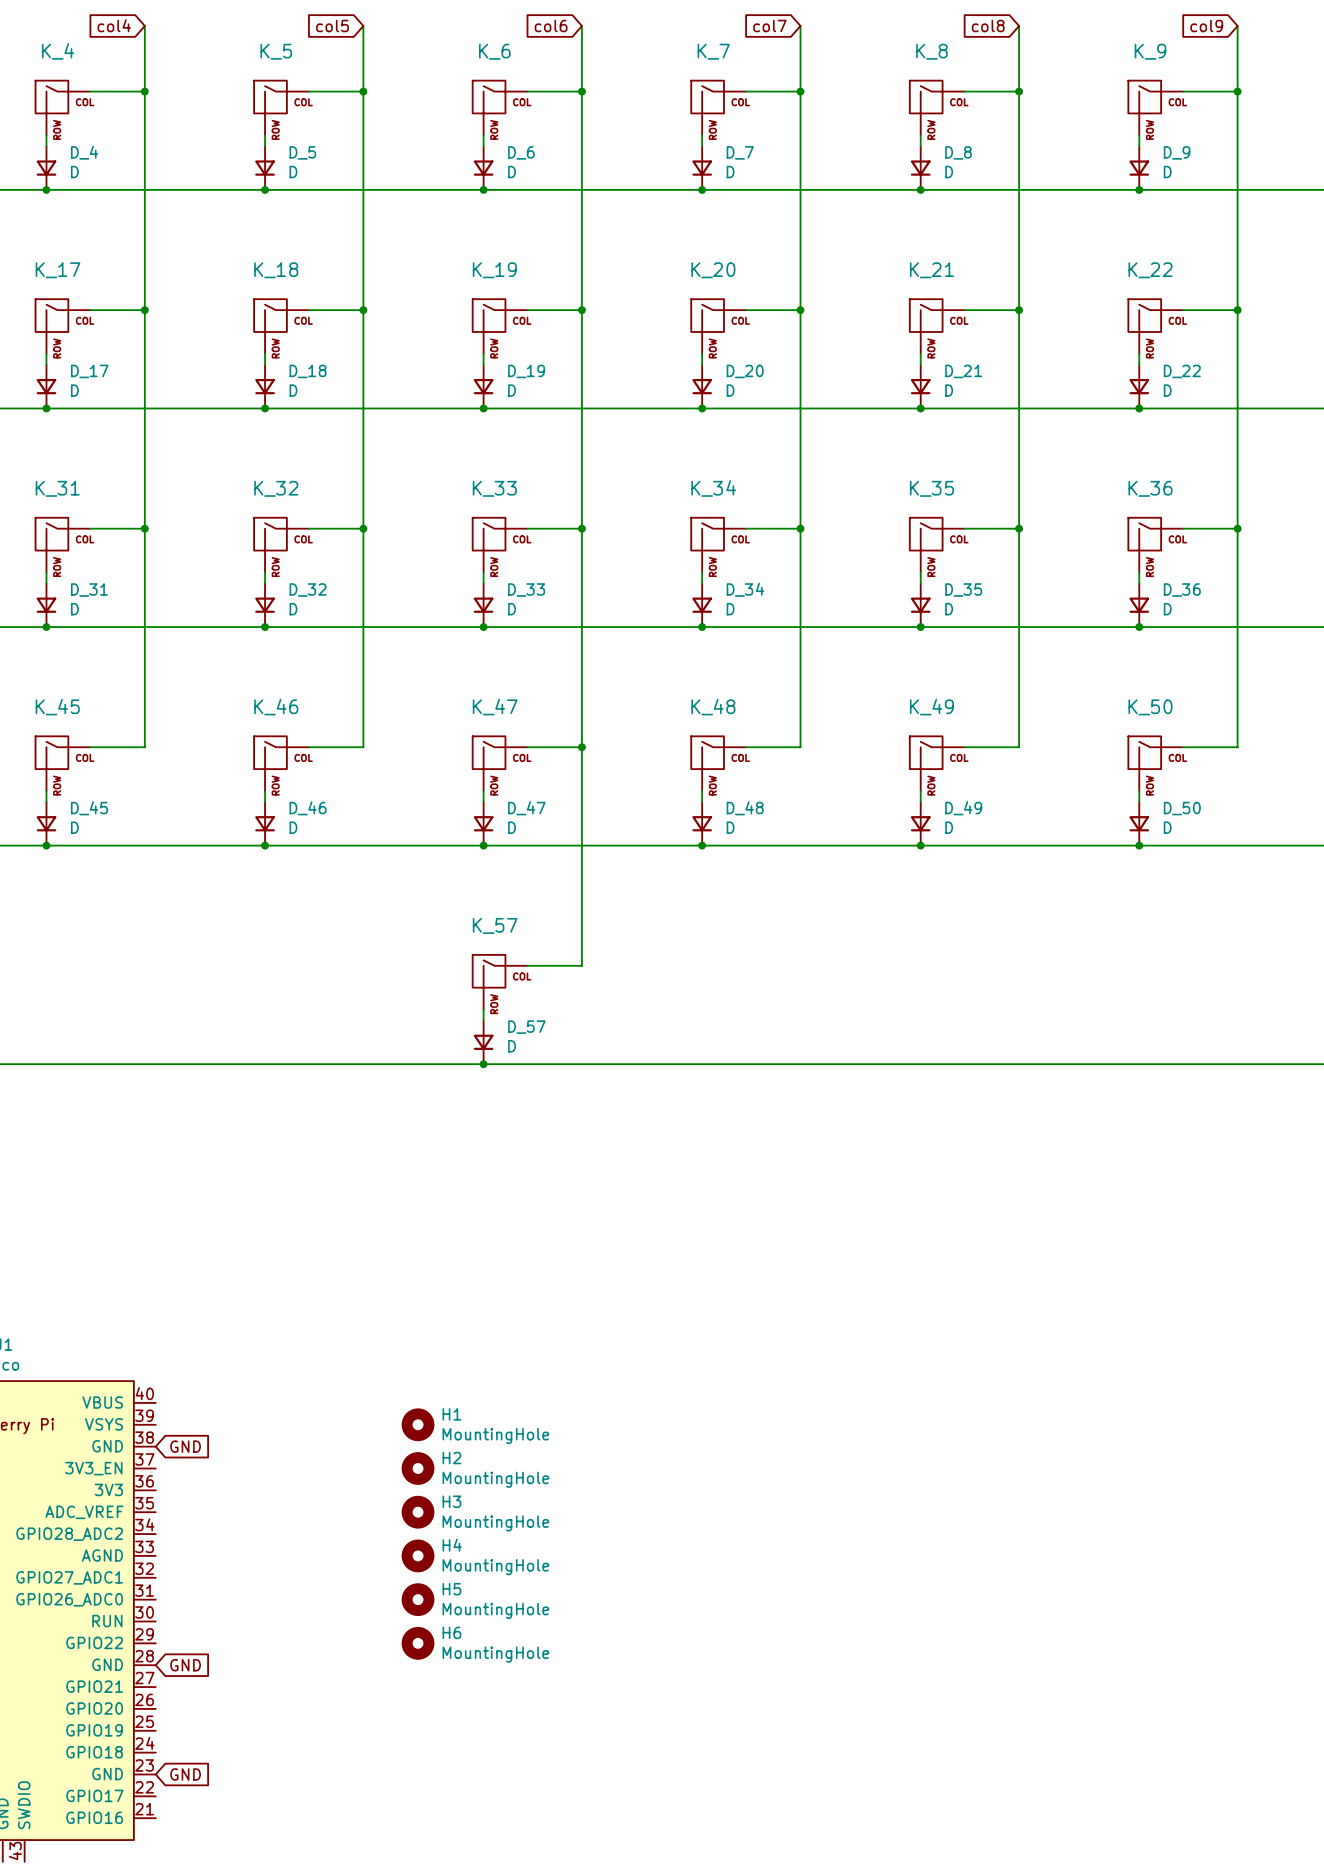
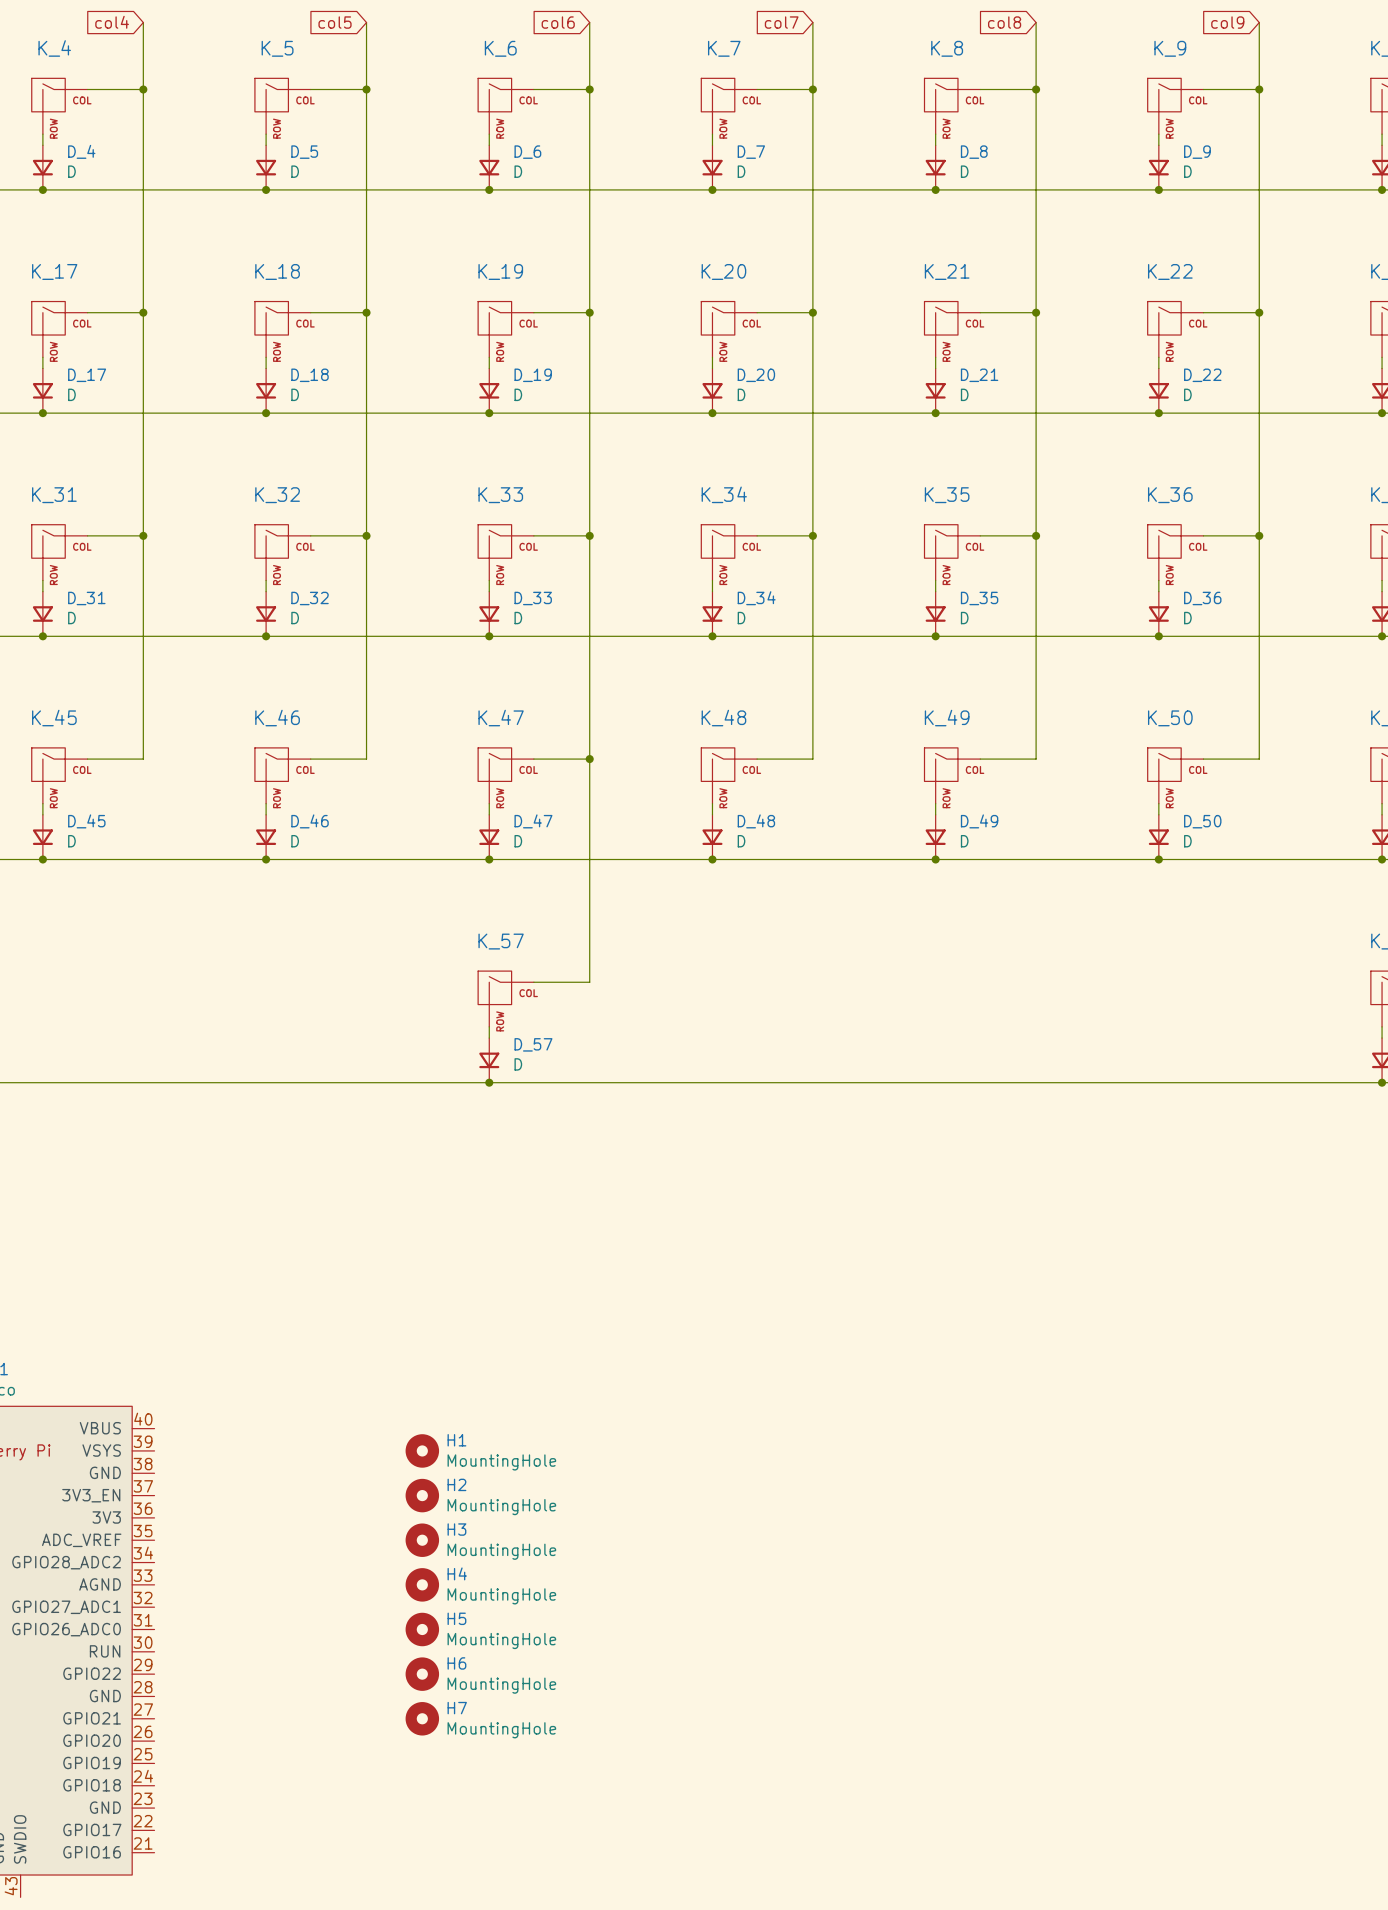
global label: GND (185, 1446) -> none
global label: GND (185, 1665) -> none
H7: none -> MountingHole (422, 1718)
global label: GND (185, 1774) -> none

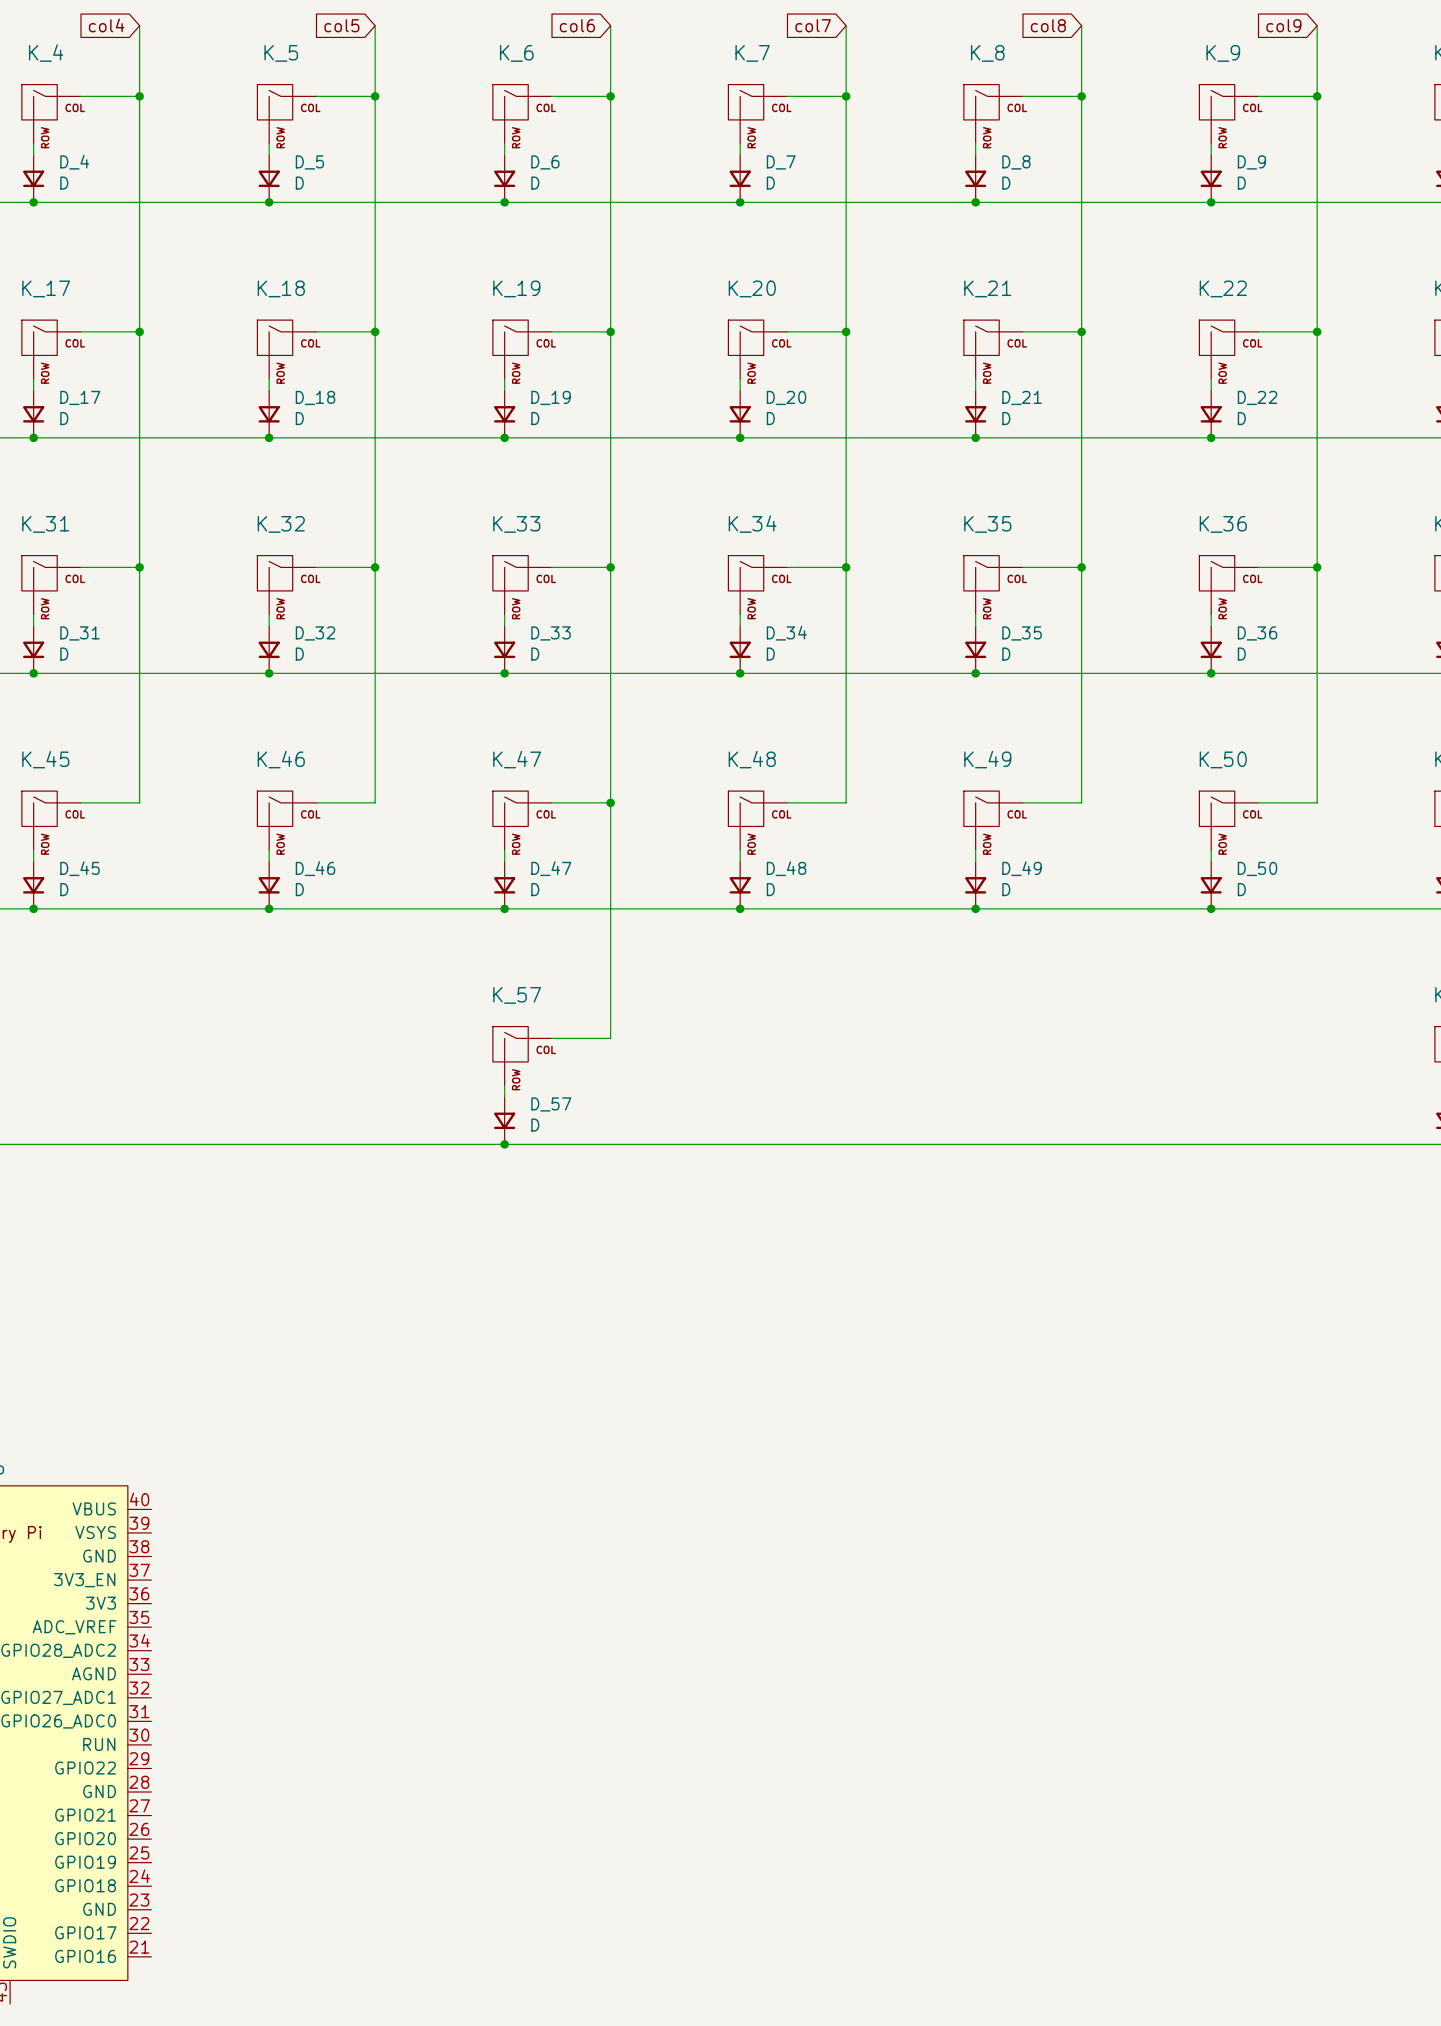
H1: MountingHole (422, 1450) -> none
H2: MountingHole (422, 1495) -> none
H3: MountingHole (422, 1540) -> none
H4: MountingHole (422, 1584) -> none
H5: MountingHole (422, 1629) -> none
H6: MountingHole (422, 1674) -> none
H7: MountingHole (422, 1718) -> none

